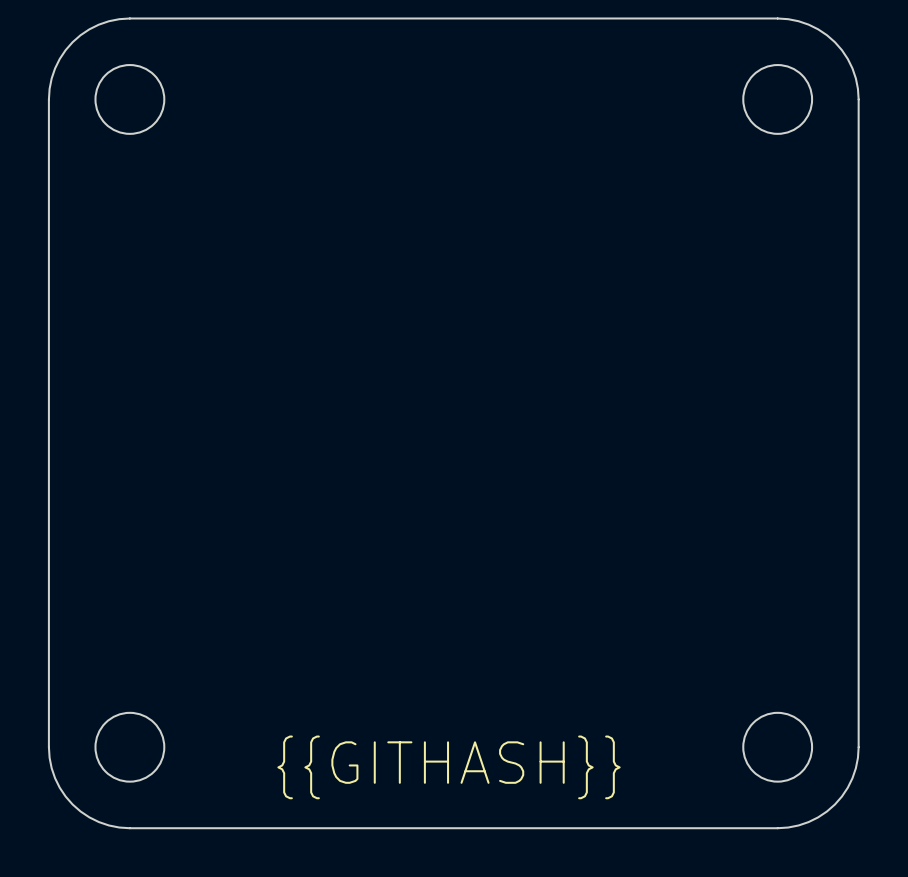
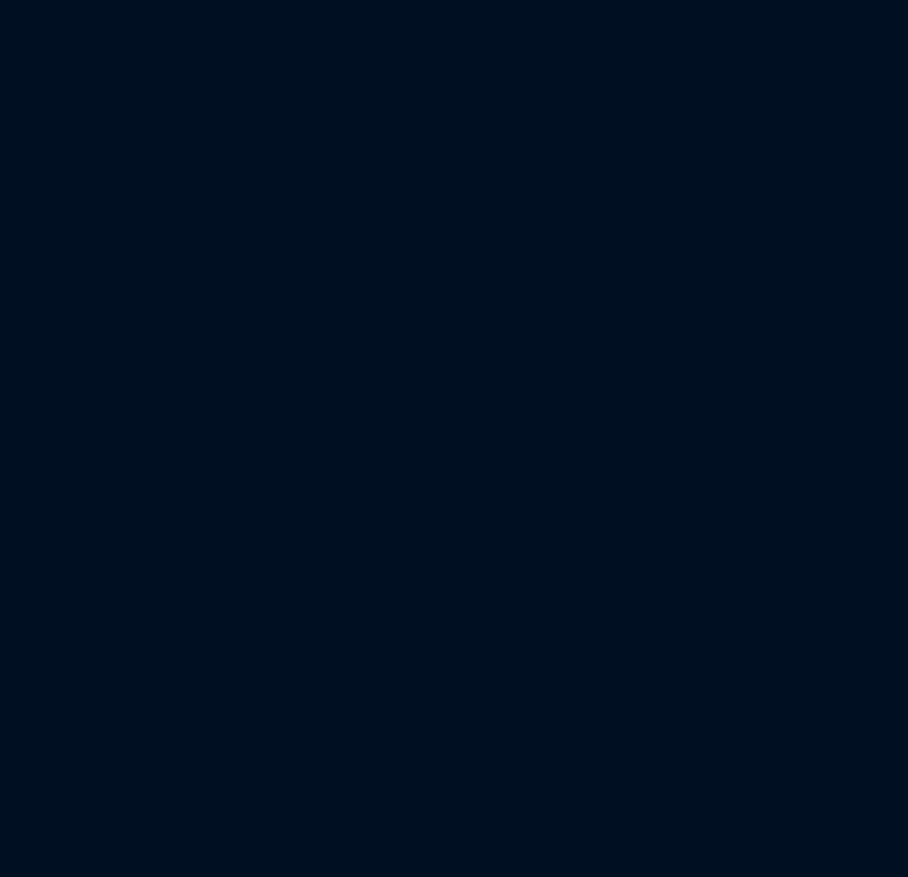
board edge: (129, 18) (777, 18) (808, 24) (834, 42) (852, 68) (858, 99) (858, 747) (852, 778) (834, 804) (808, 822) (777, 828) (129, 828) (98, 822) (72, 804) (55, 778) (48, 747) (49, 88) (59, 58) (72, 42) (98, 24) (129, 18) -> none
round board edge: [94, 64, 166, 135] -> none
round board edge: [742, 64, 814, 135] -> none
round board edge: [94, 711, 166, 783] -> none
round board edge: [742, 711, 814, 783] -> none
text: {{GITHASH}} (449, 767) -> none

